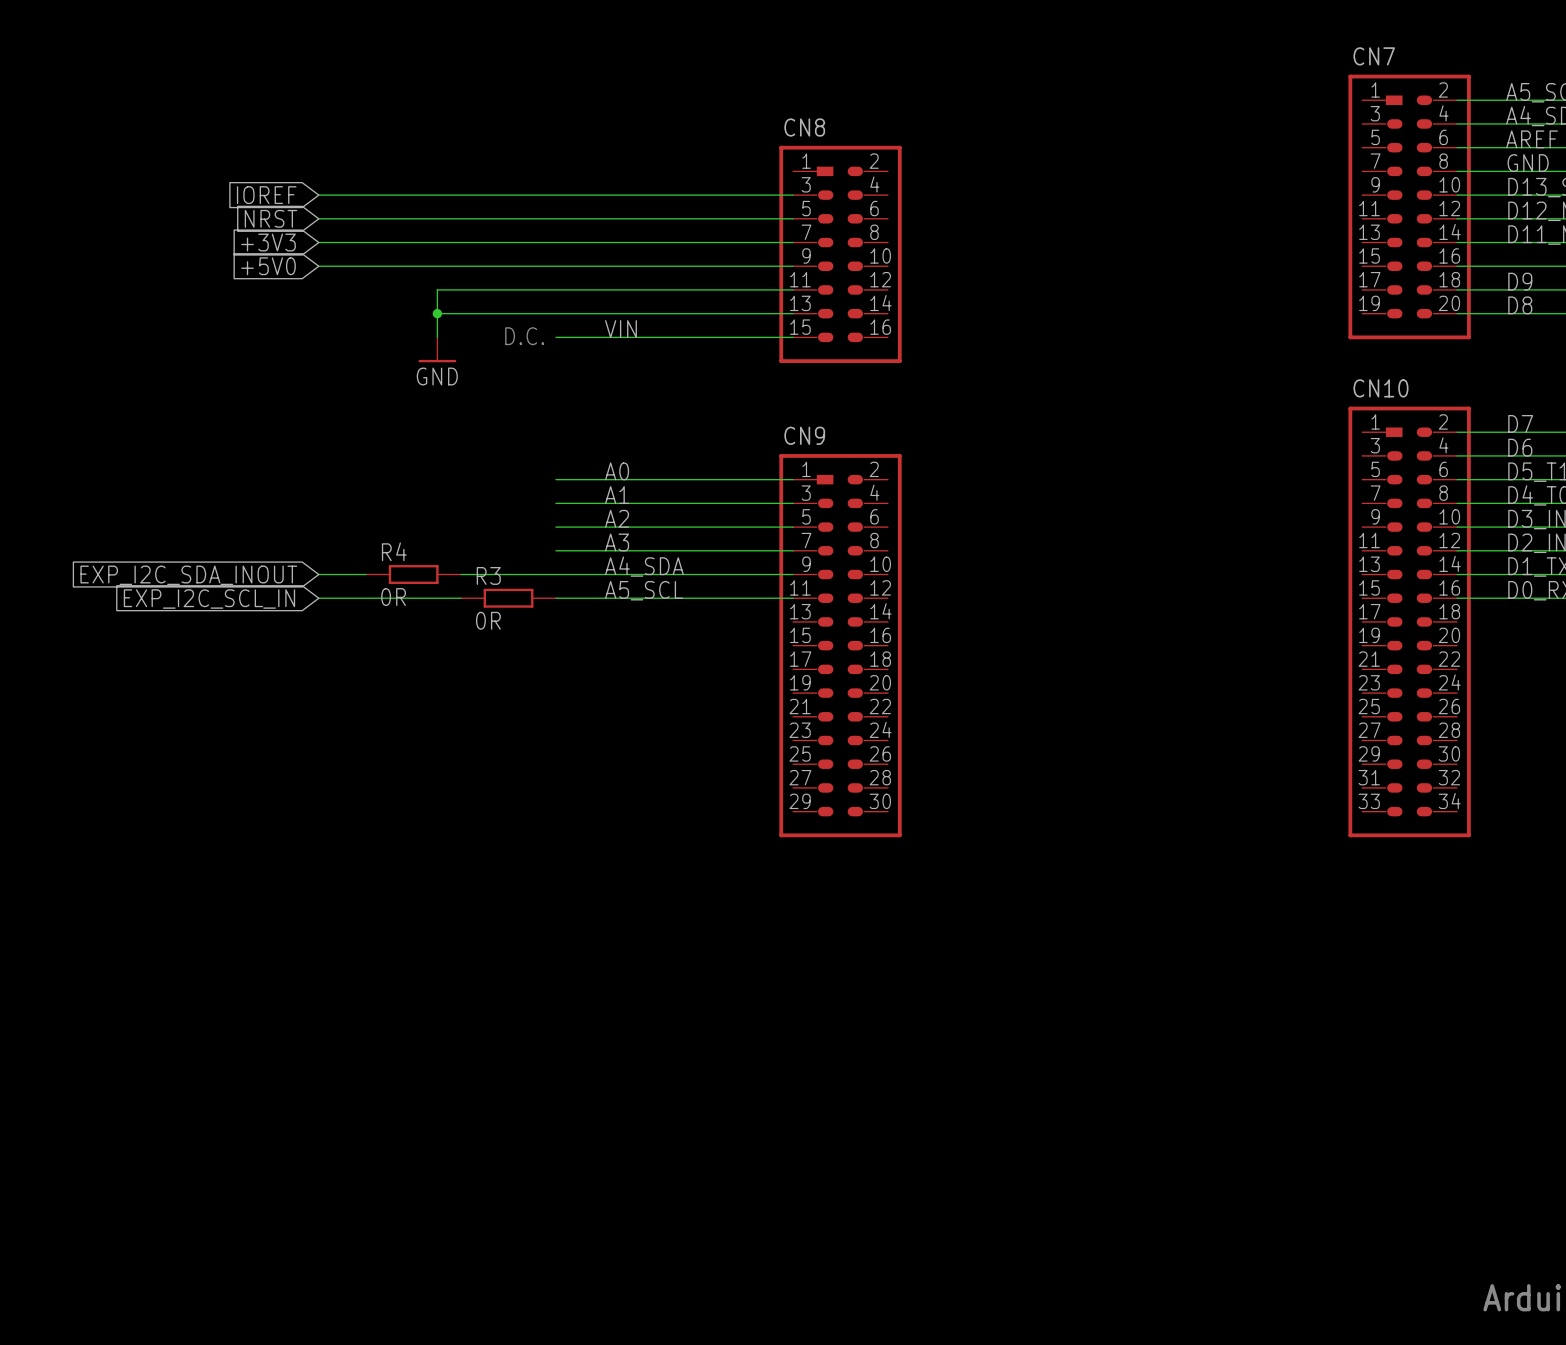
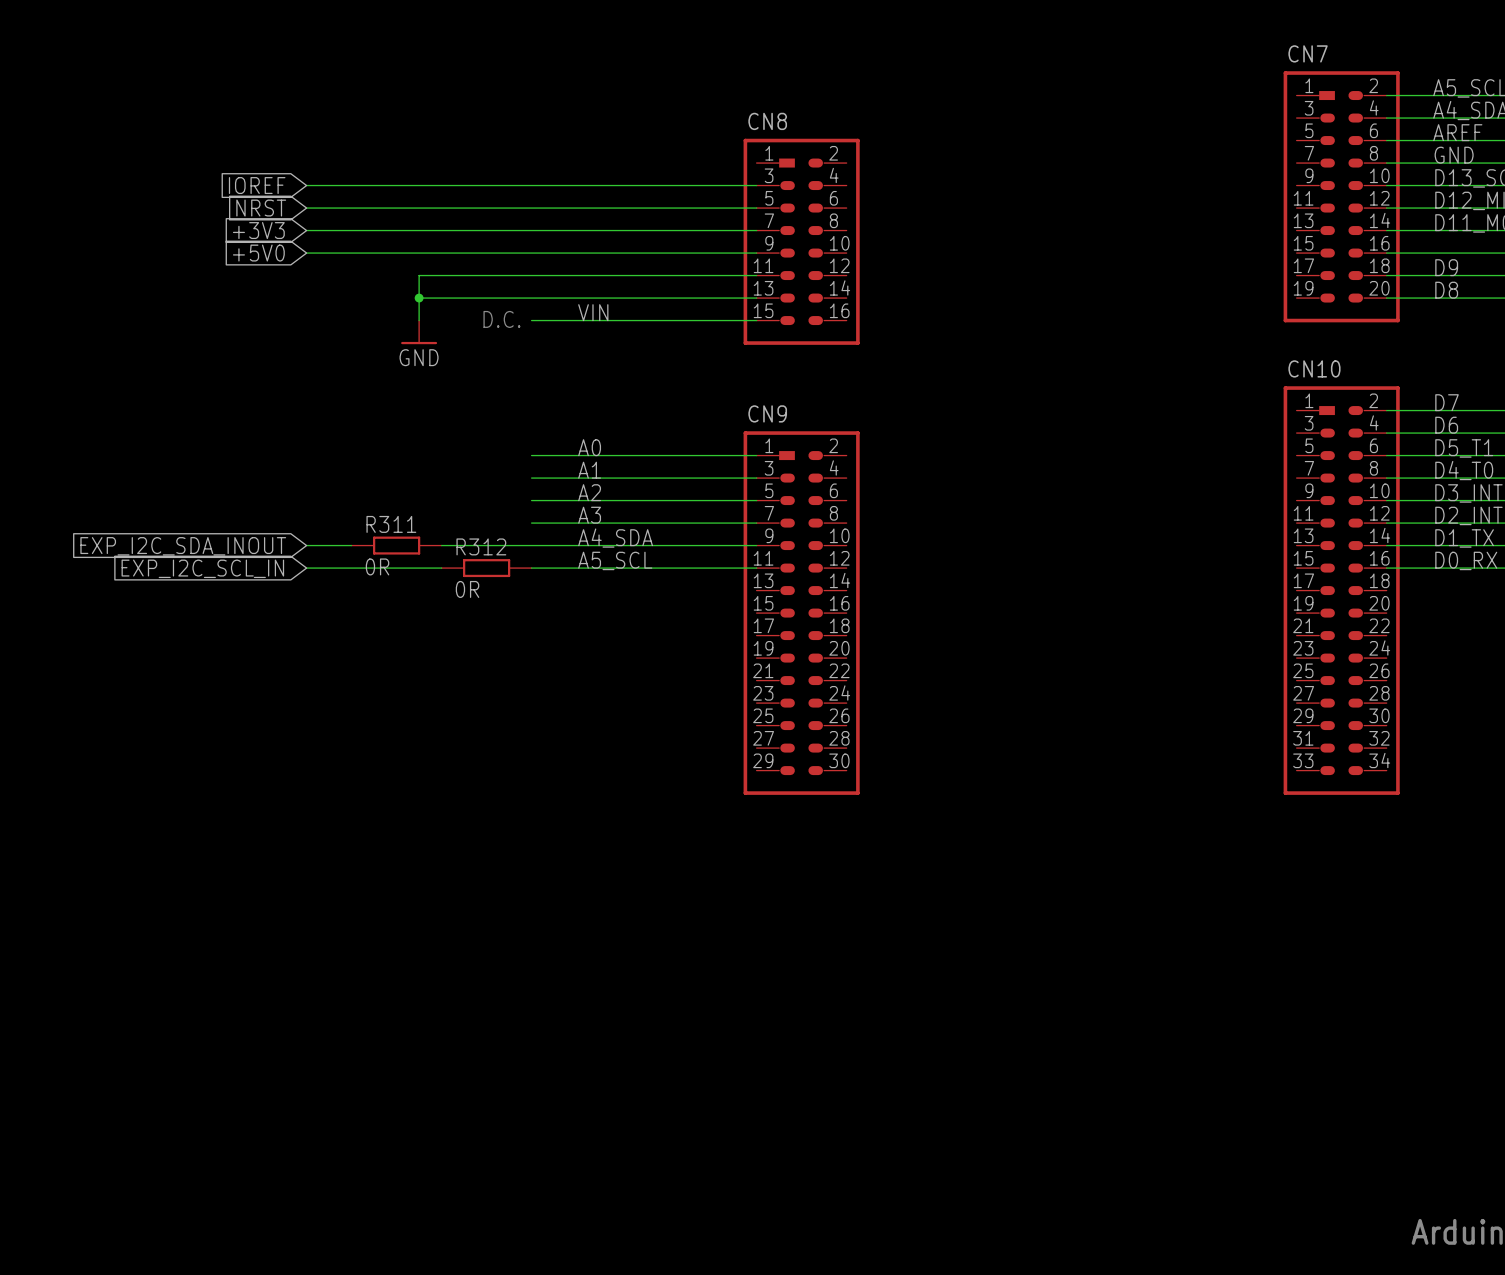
R4 name: R4 (394, 551) -> R311 (391, 524)
R3 name: R3 (488, 575) -> R312 (481, 546)

